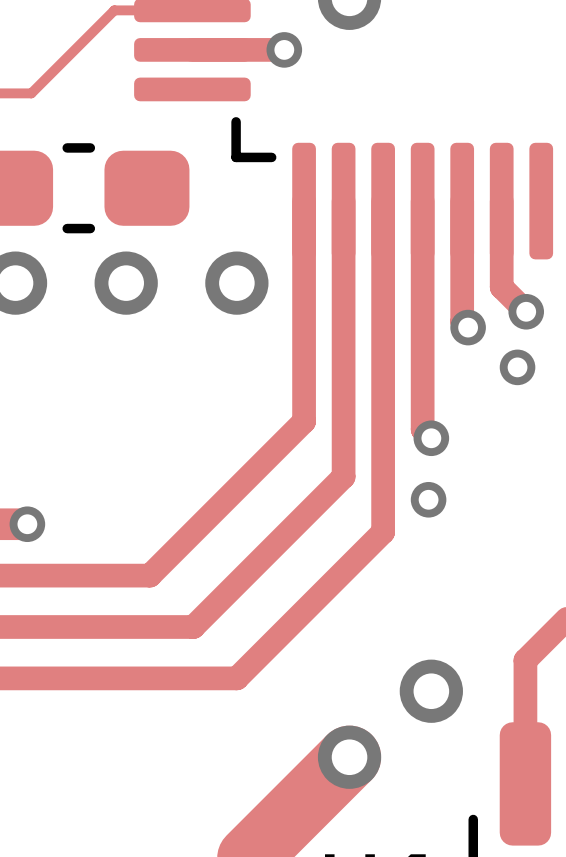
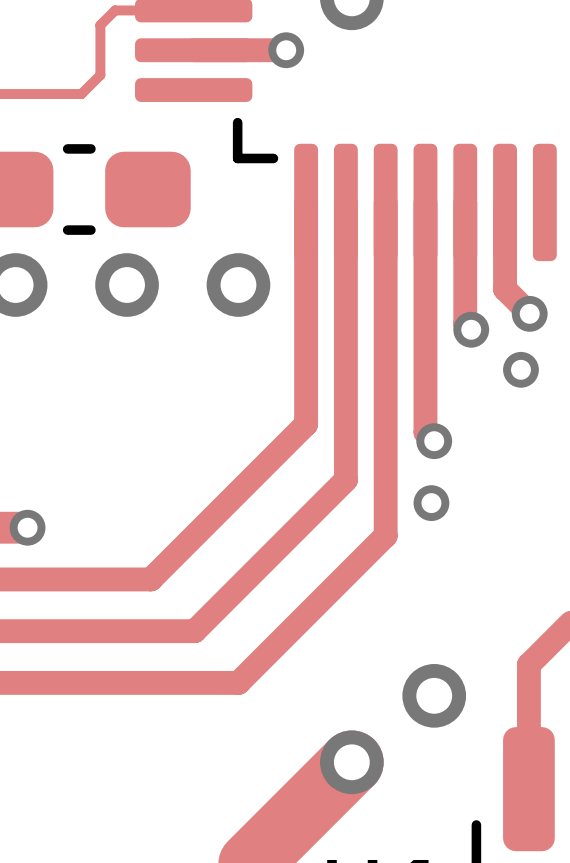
track: (99, 24) (31, 93) -> (100, 25) (100, 75) (81, 94) (31, 94)

